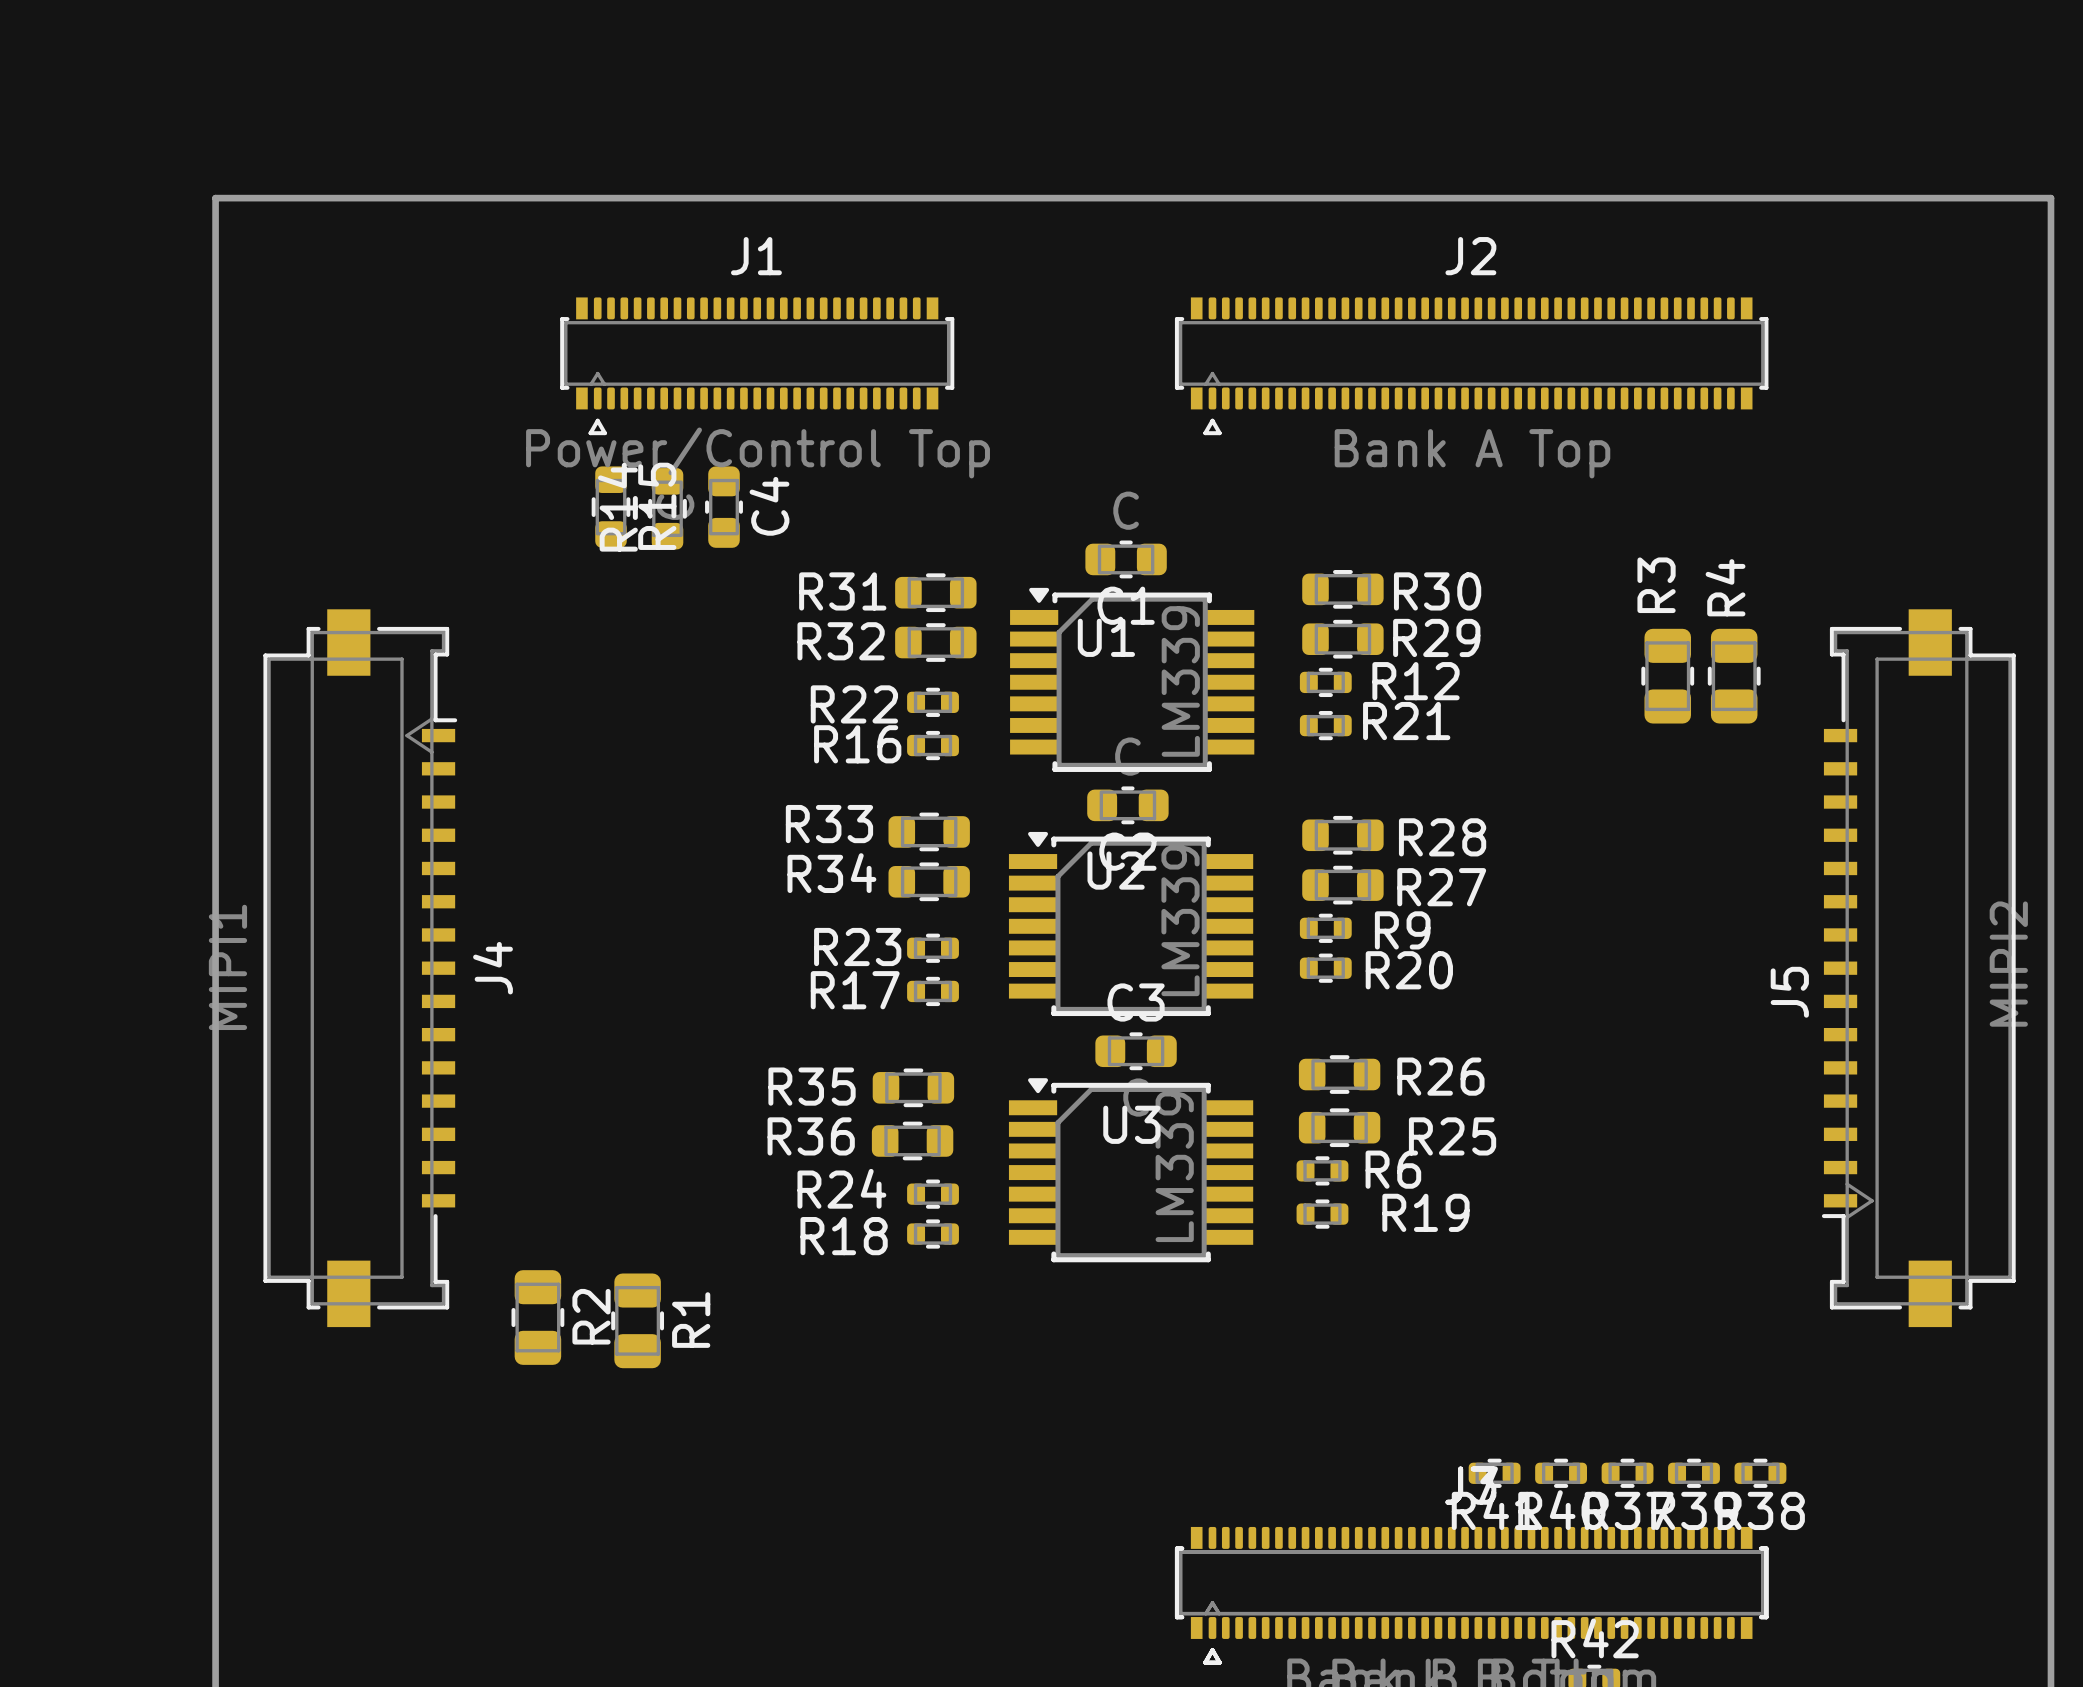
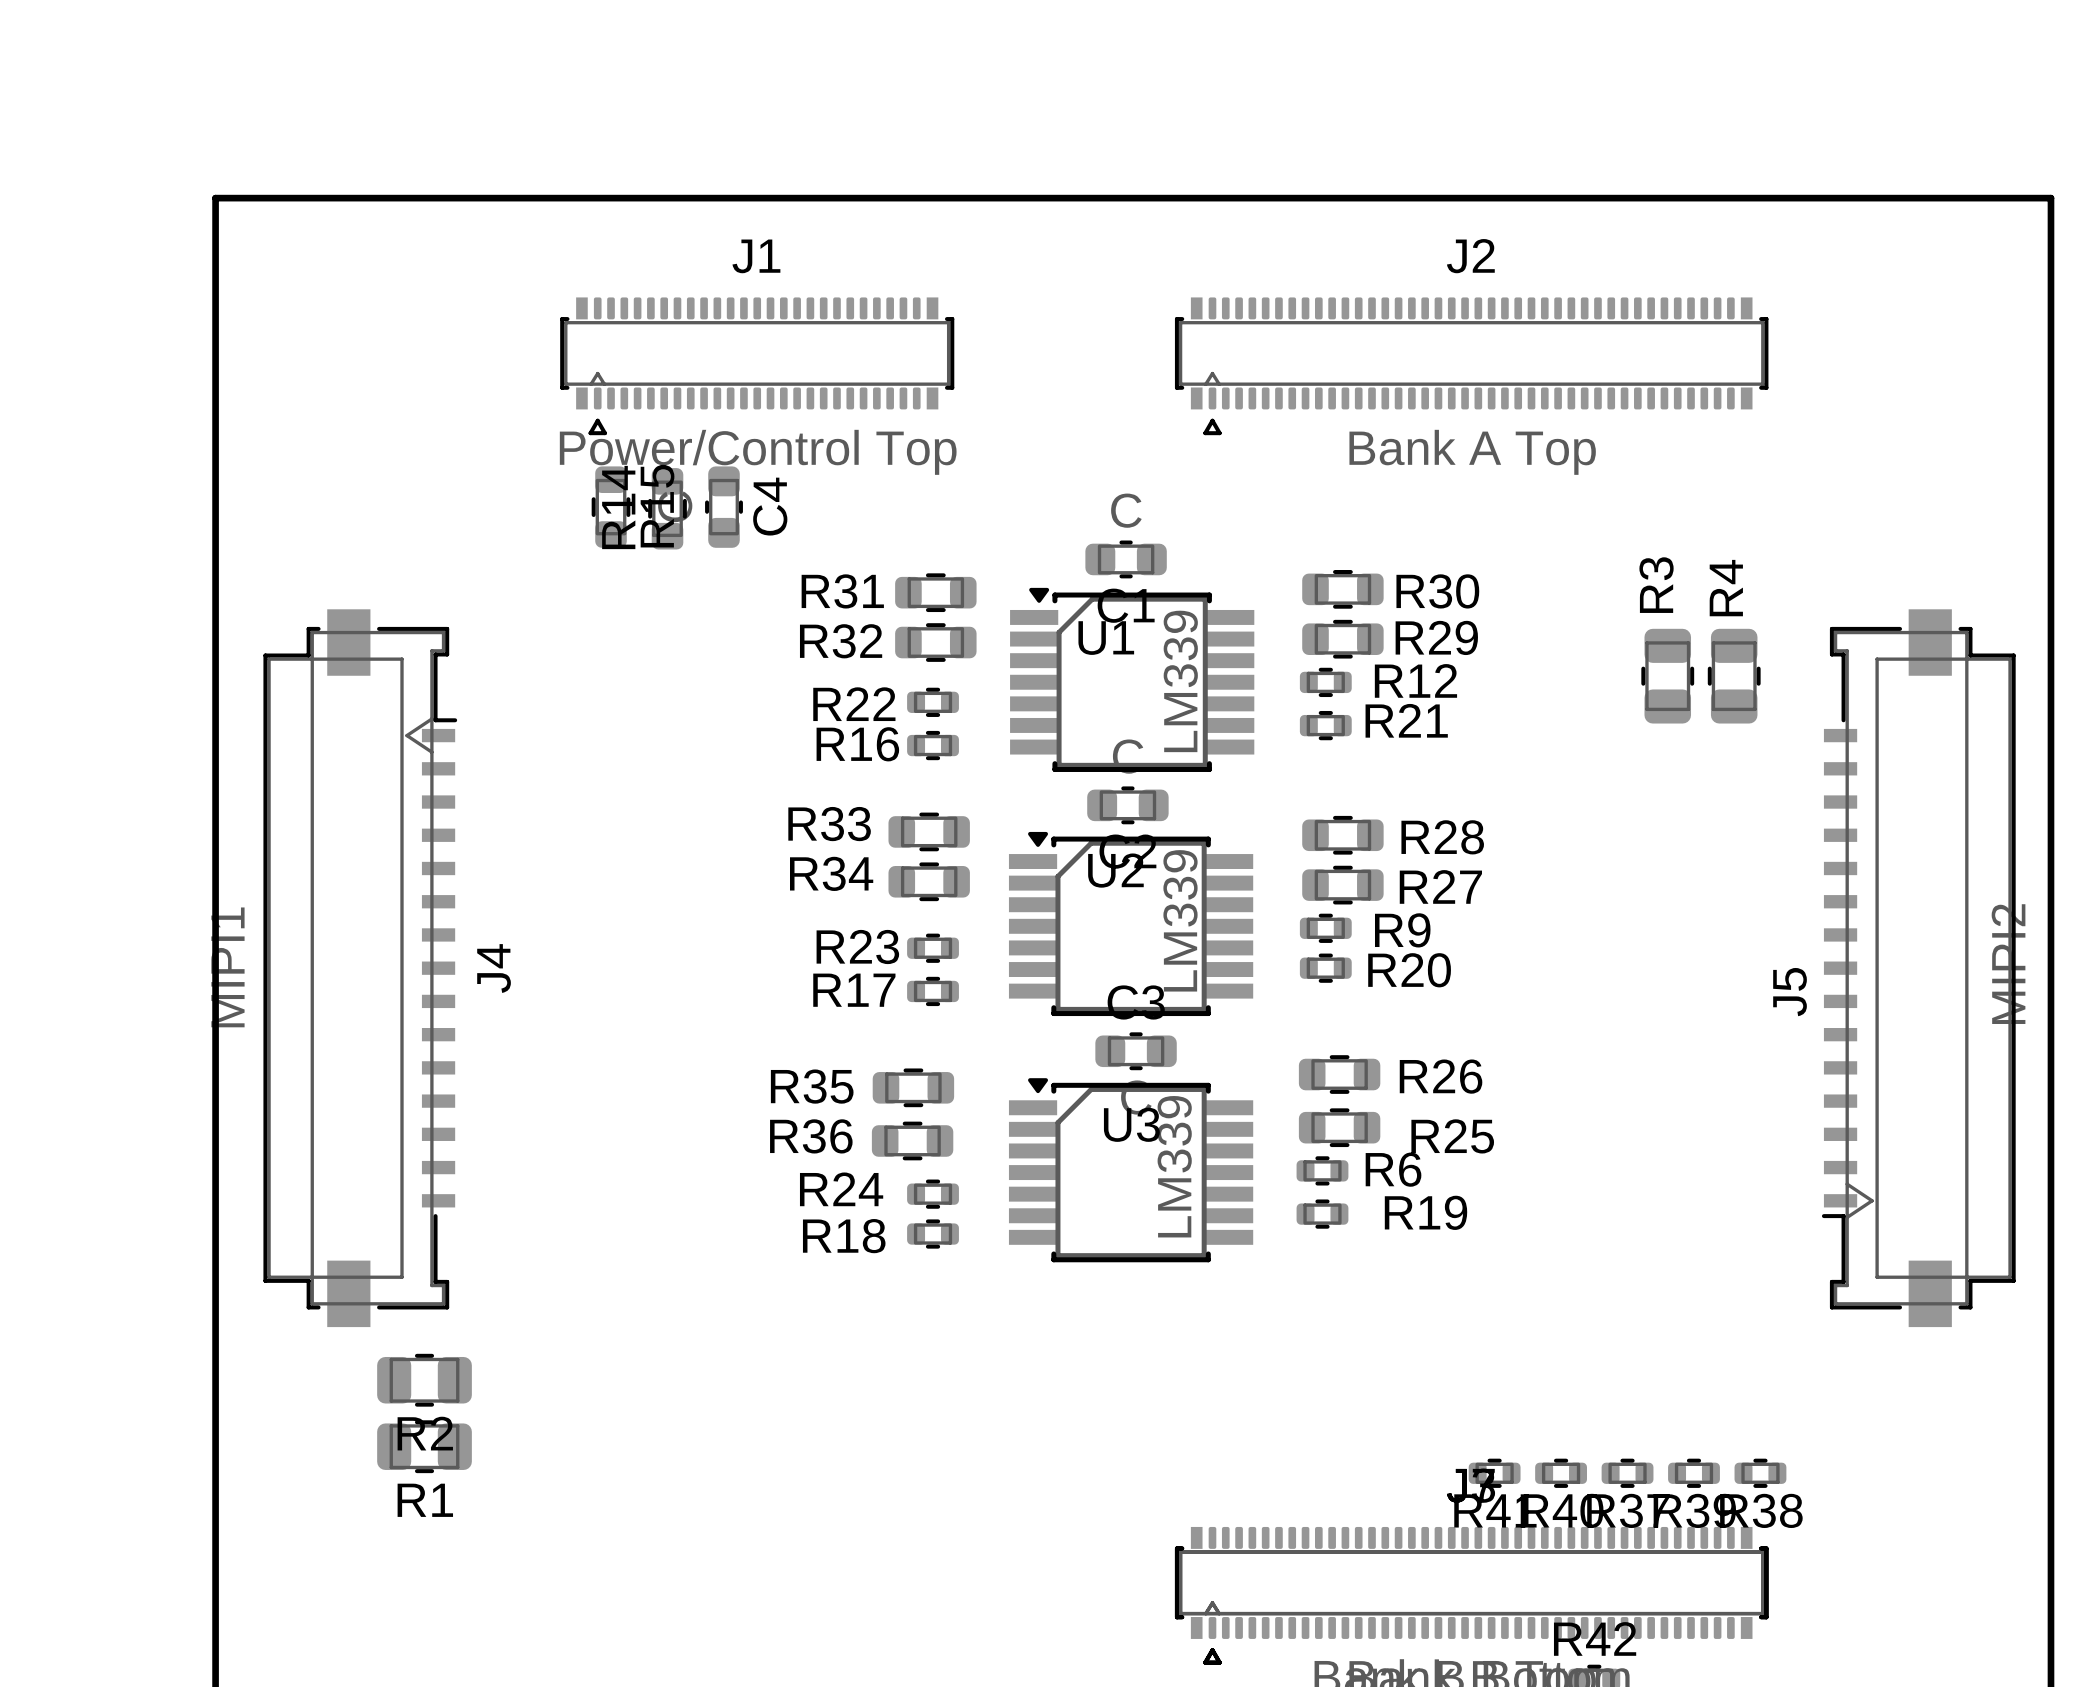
R2 rotation: 0° (537, 1317) -> 90° clockwise (424, 1380)
R2 position: (537, 1317) -> (424, 1380)
R1 rotation: 0° (637, 1320) -> 90° clockwise (424, 1446)
R1 position: (637, 1320) -> (424, 1446)

